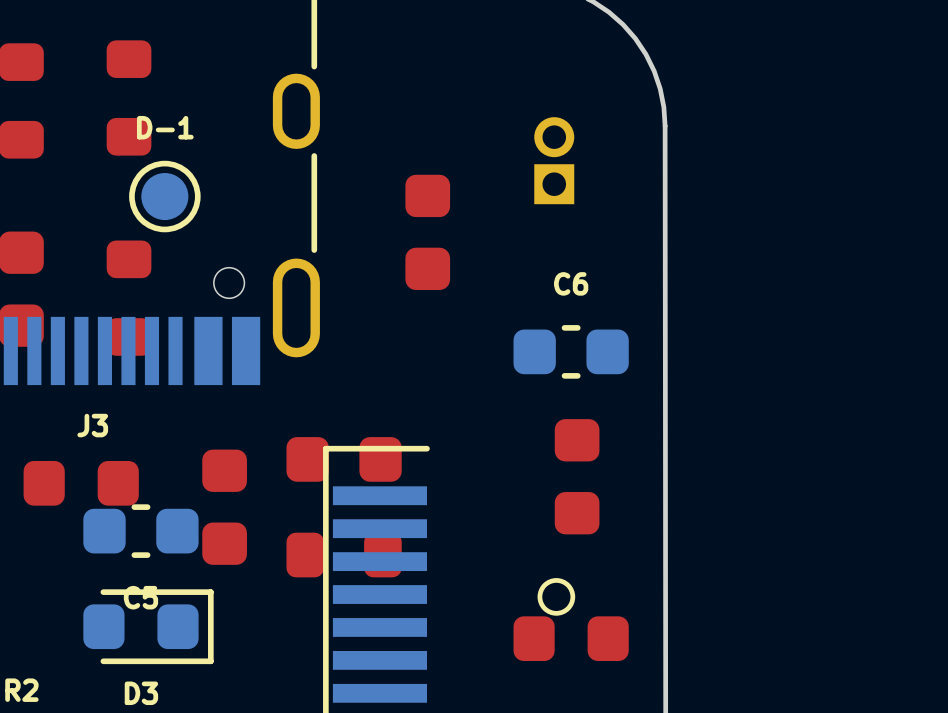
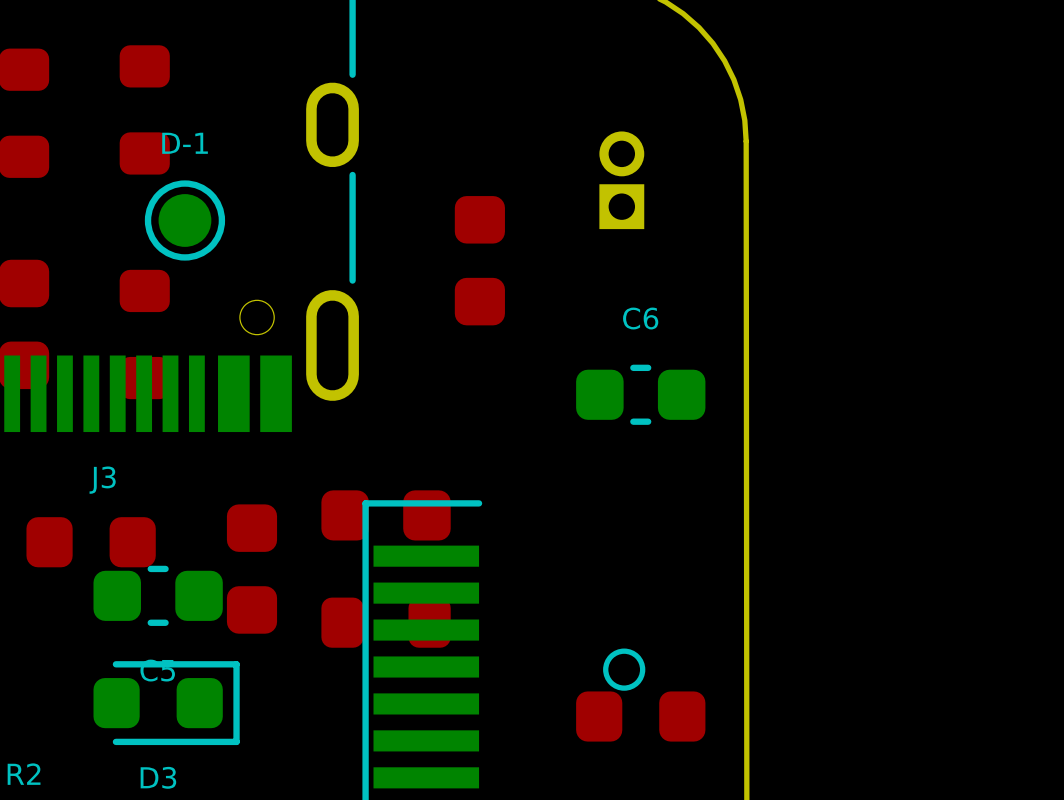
part: (577, 476) -> none

